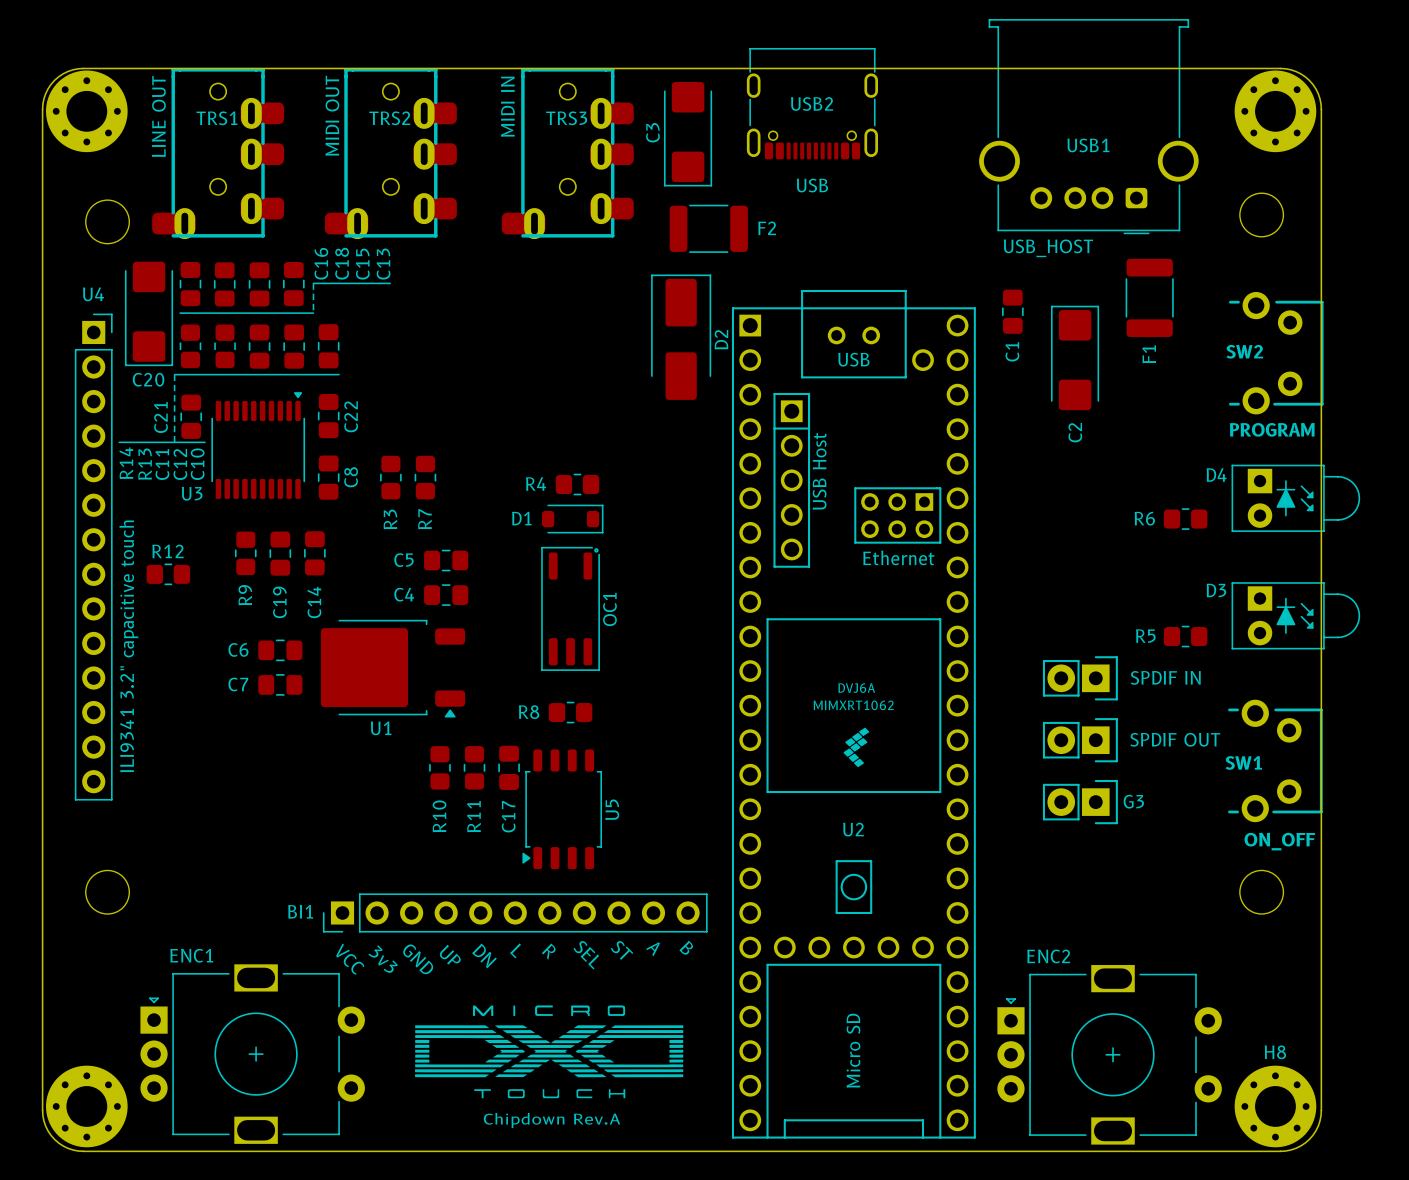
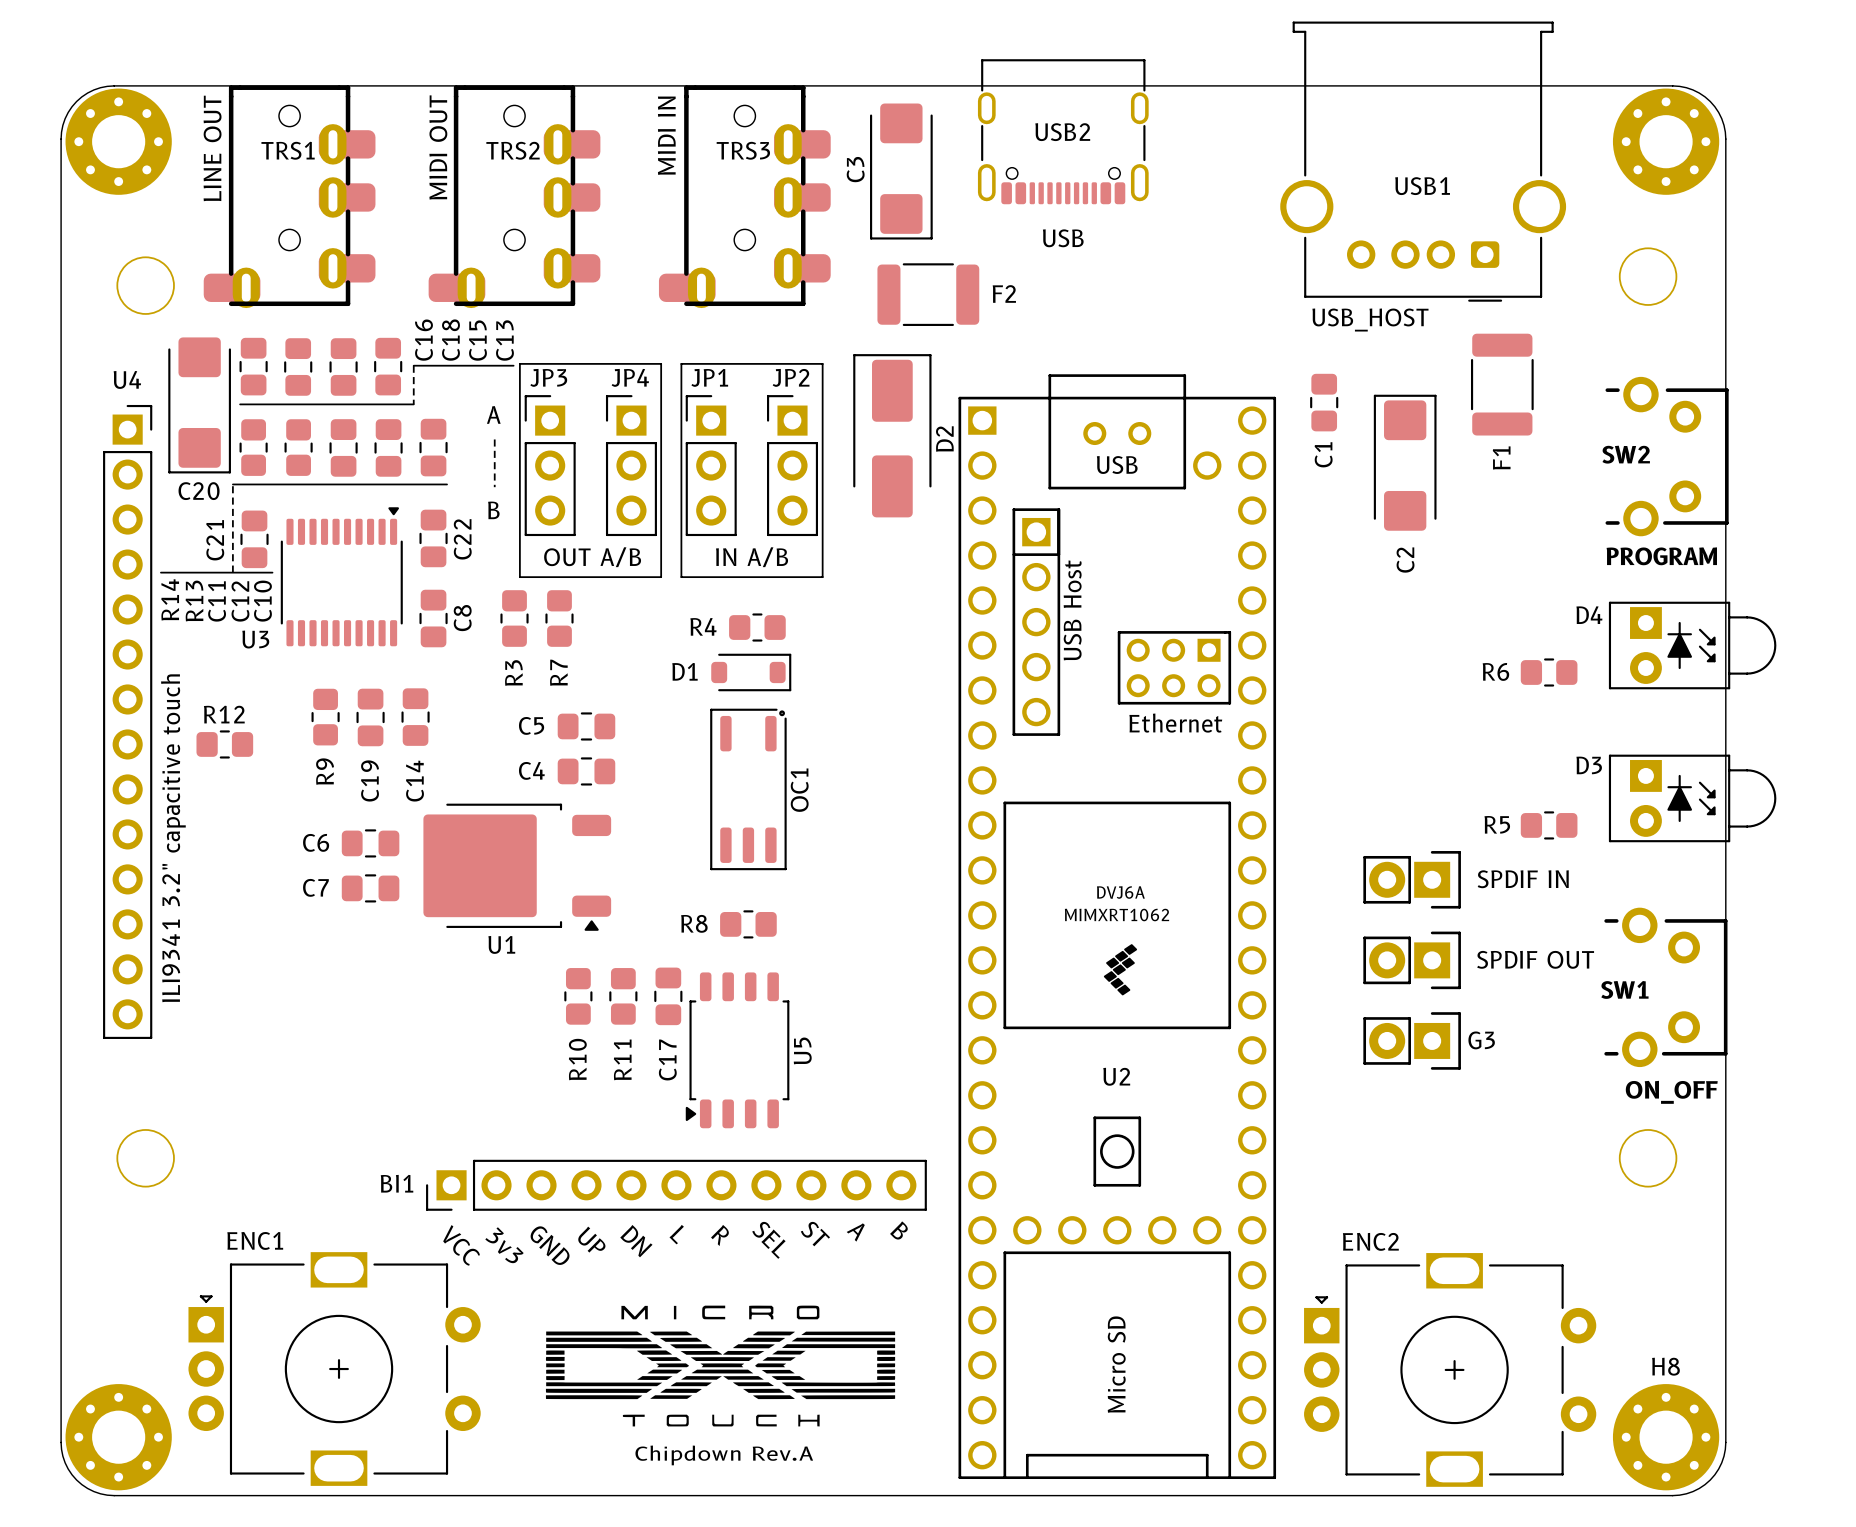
line: none -> (519, 363) (661, 363) (661, 577) (519, 577) (519, 363)
line: none -> (681, 363) (822, 363) (822, 577) (681, 577) (681, 363)
text: none -> A (493, 414)
line: none -> (494, 439) (494, 487)
JP3: none -> (550, 465)
JP4: none -> (631, 465)
JP1: none -> (711, 465)
JP2: none -> (792, 465)
text: none -> B (493, 510)
text: none -> OUT A/B (592, 557)
text: none -> IN A/B (752, 557)

